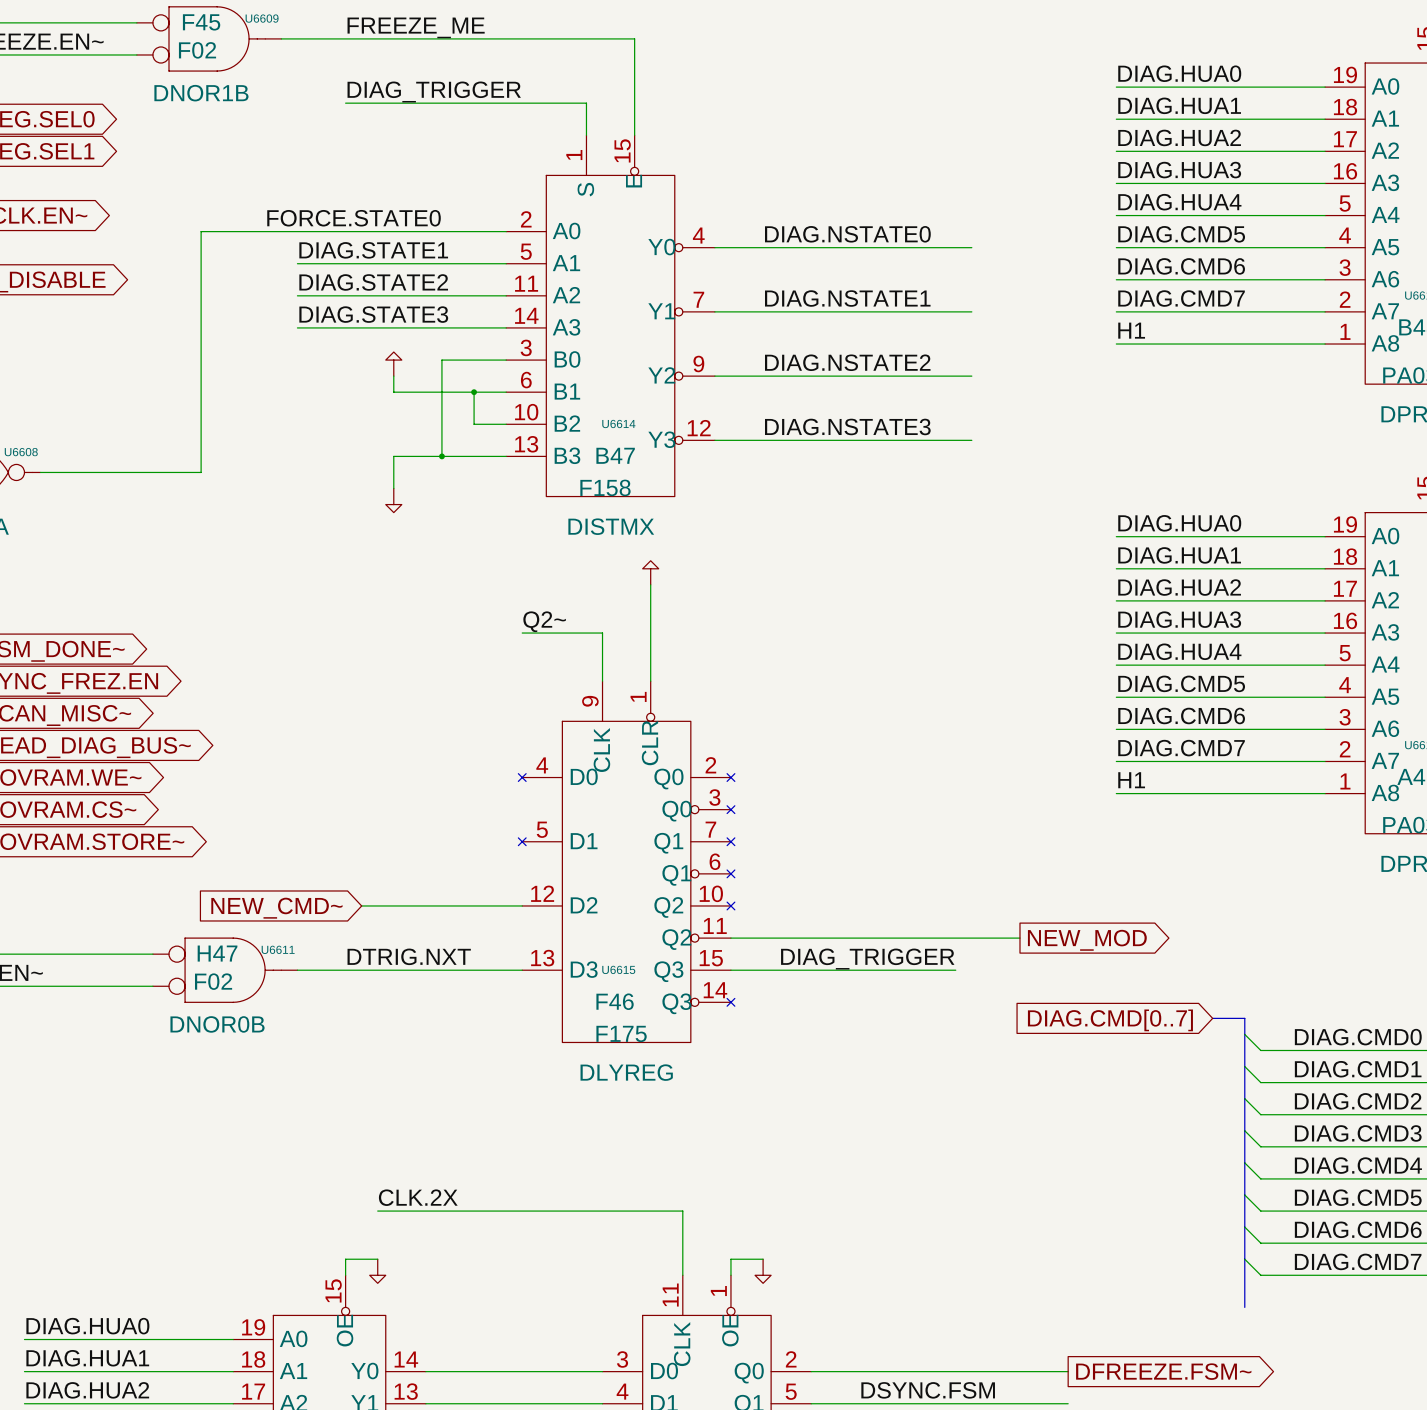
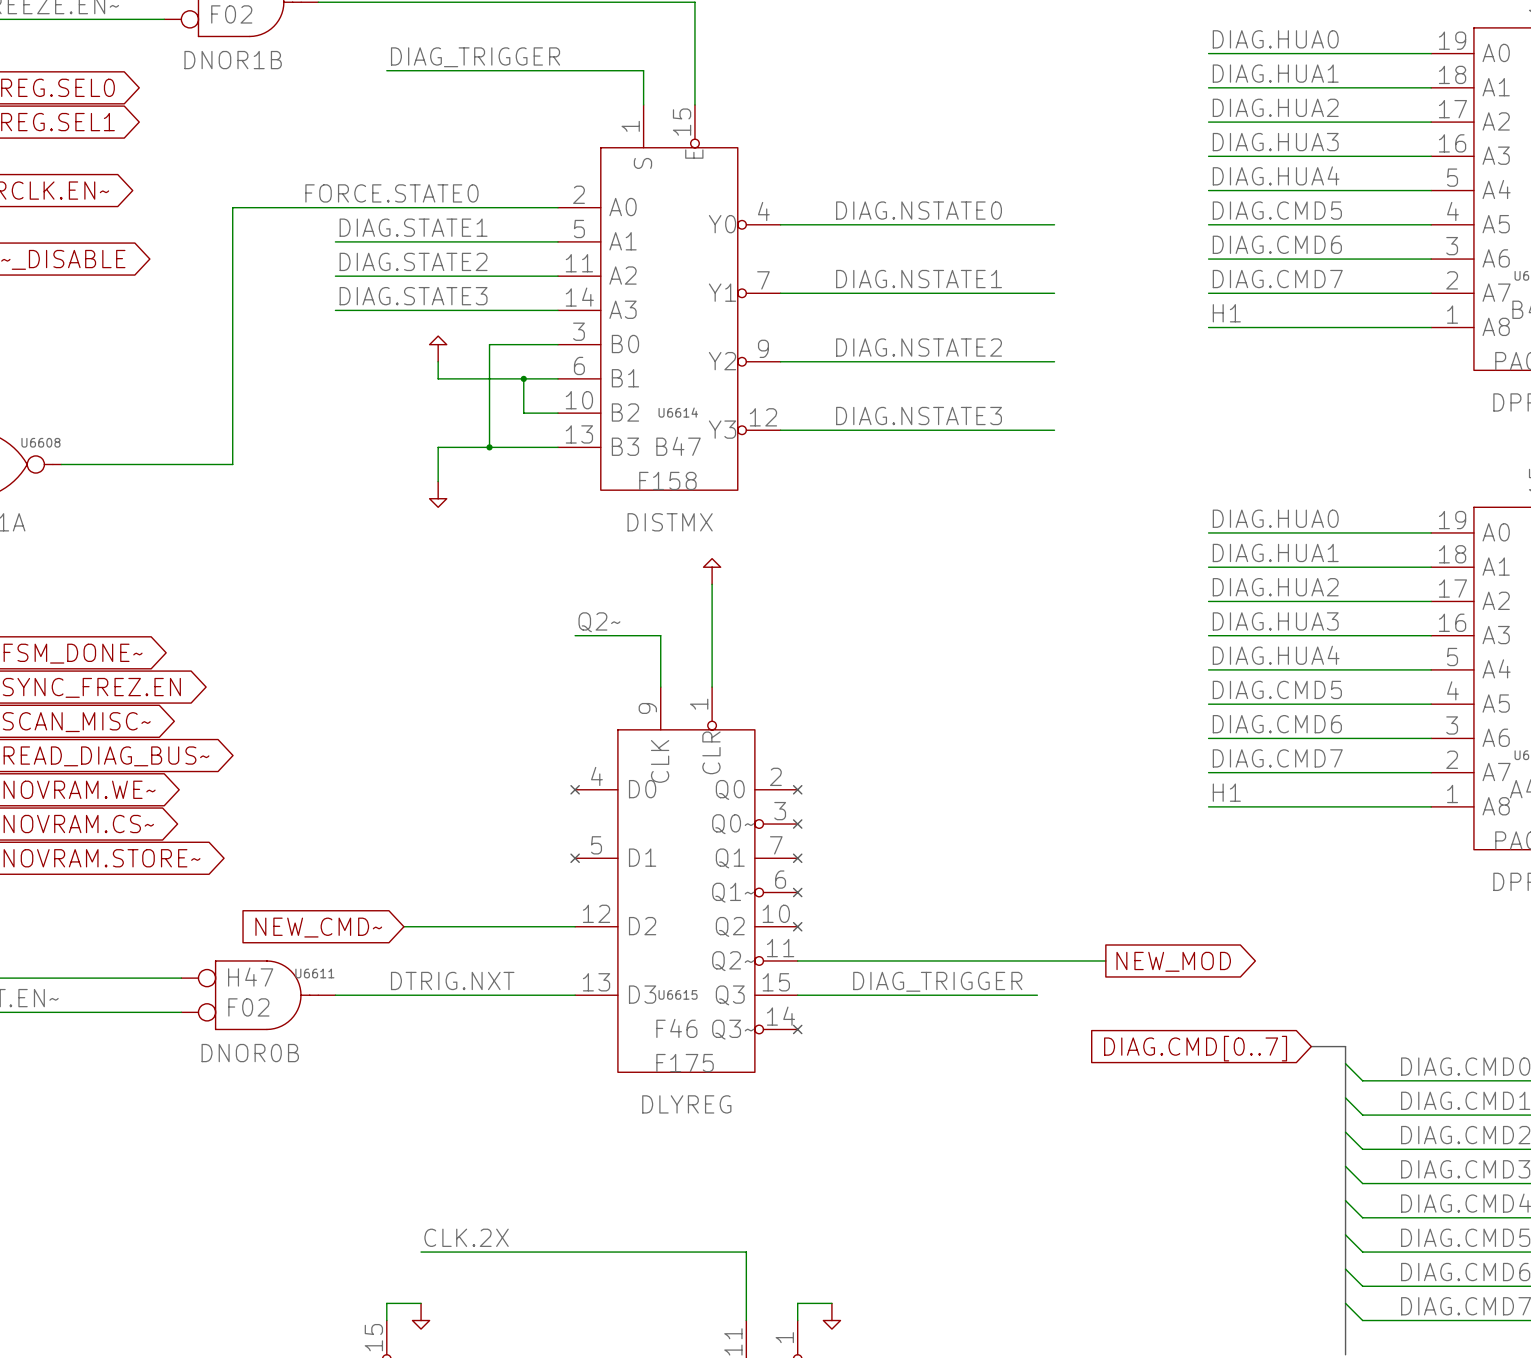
U6615 pin name: Q0 (676, 811) -> Q0~ (733, 824)
U6615 pin name: Q1 (676, 875) -> Q1~ (733, 892)
U6615 pin name: Q2 (676, 939) -> Q2~ (733, 961)
U6615 pin name: Q3 (676, 1003) -> Q3~ (733, 1029)

